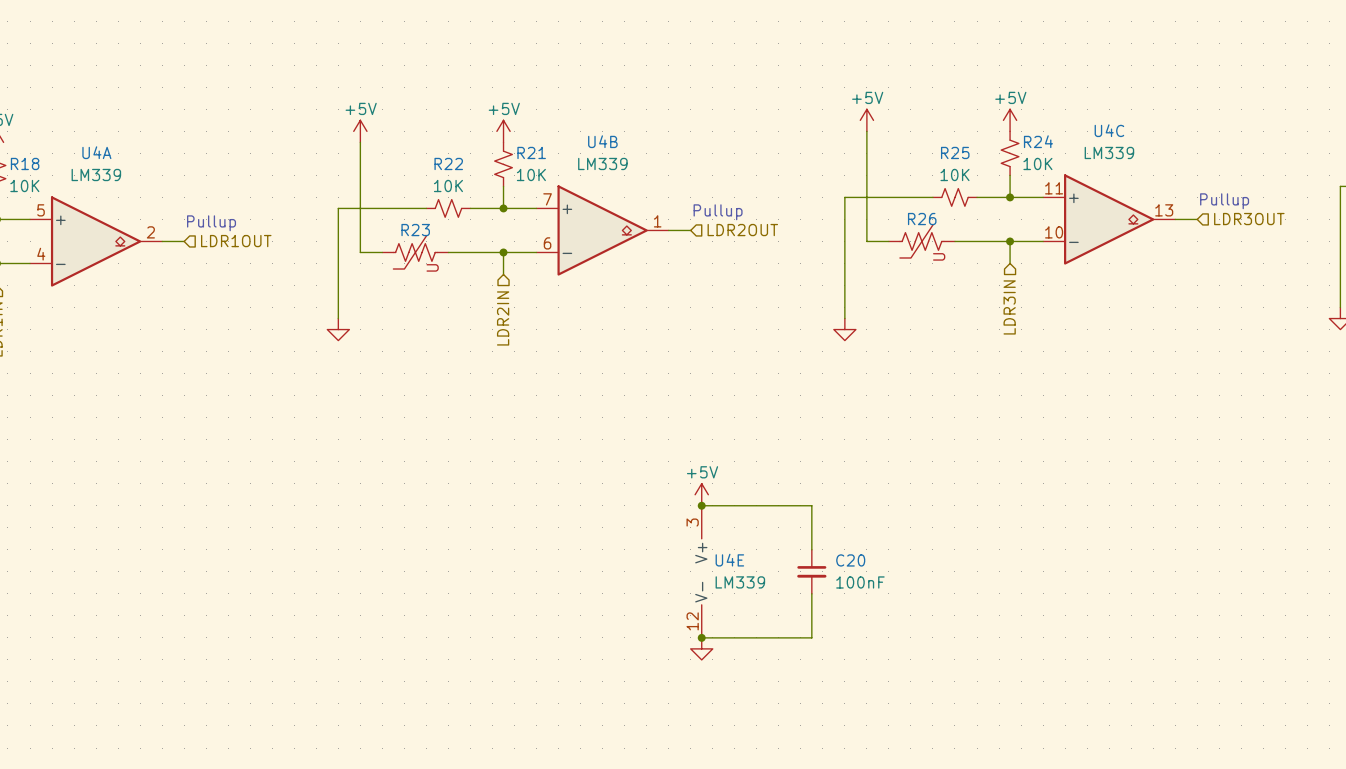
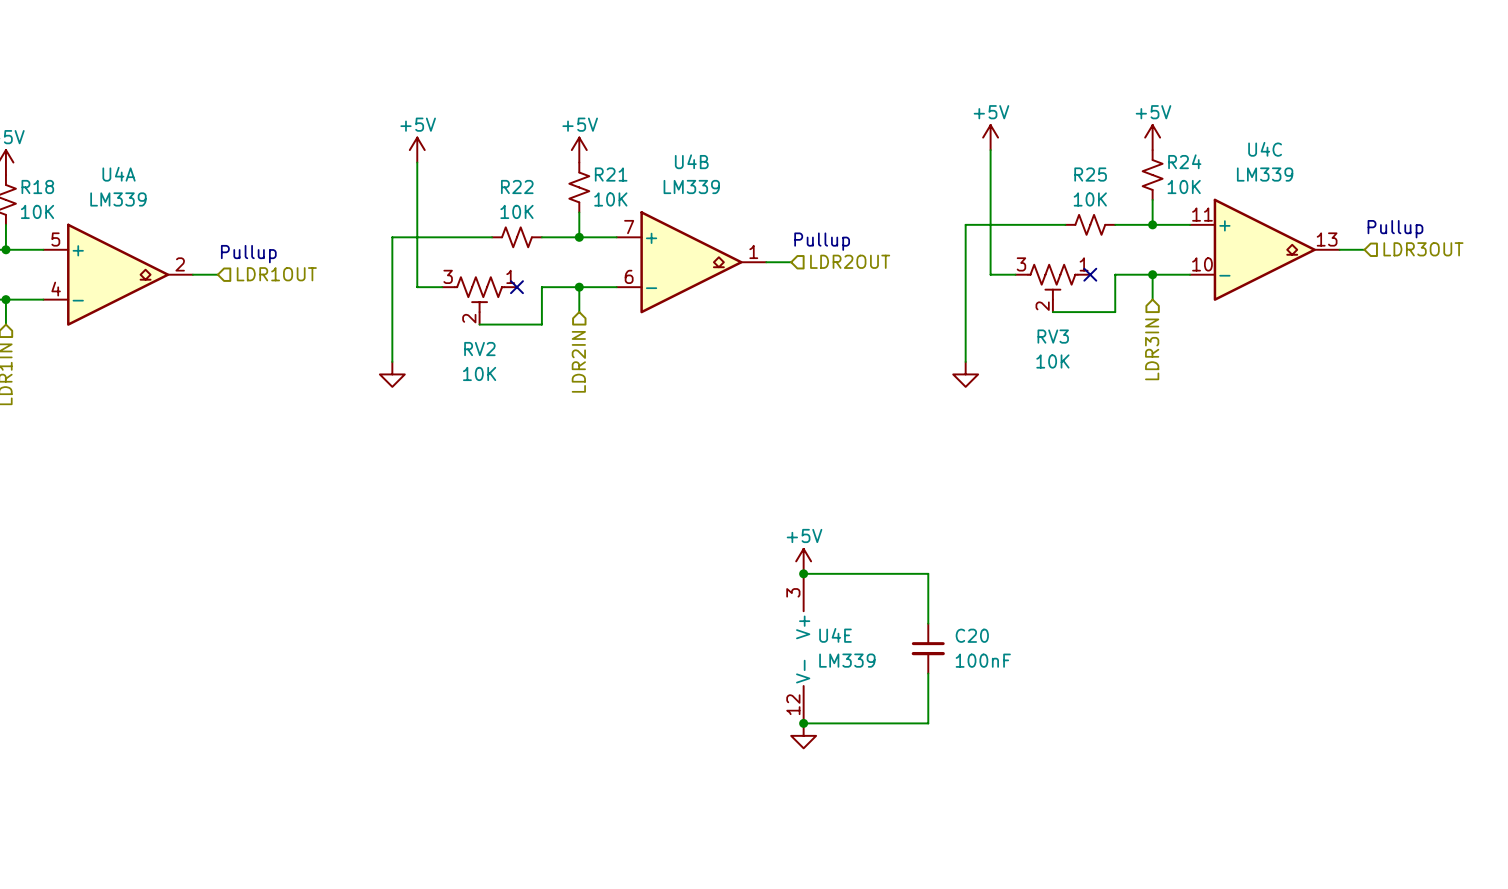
R26: (921, 241) -> none
wire: (954, 241) (977, 241) -> (1052, 312) (1115, 312) (1115, 274)
no-connect mark: none -> (1090, 274)
R23: (415, 252) -> none
wire: (448, 252) (470, 252) -> (479, 324) (541, 324) (541, 287)
no-connect mark: none -> (516, 287)
RV3: none -> 10K (1052, 288)
RV2: none -> 10K (479, 300)

